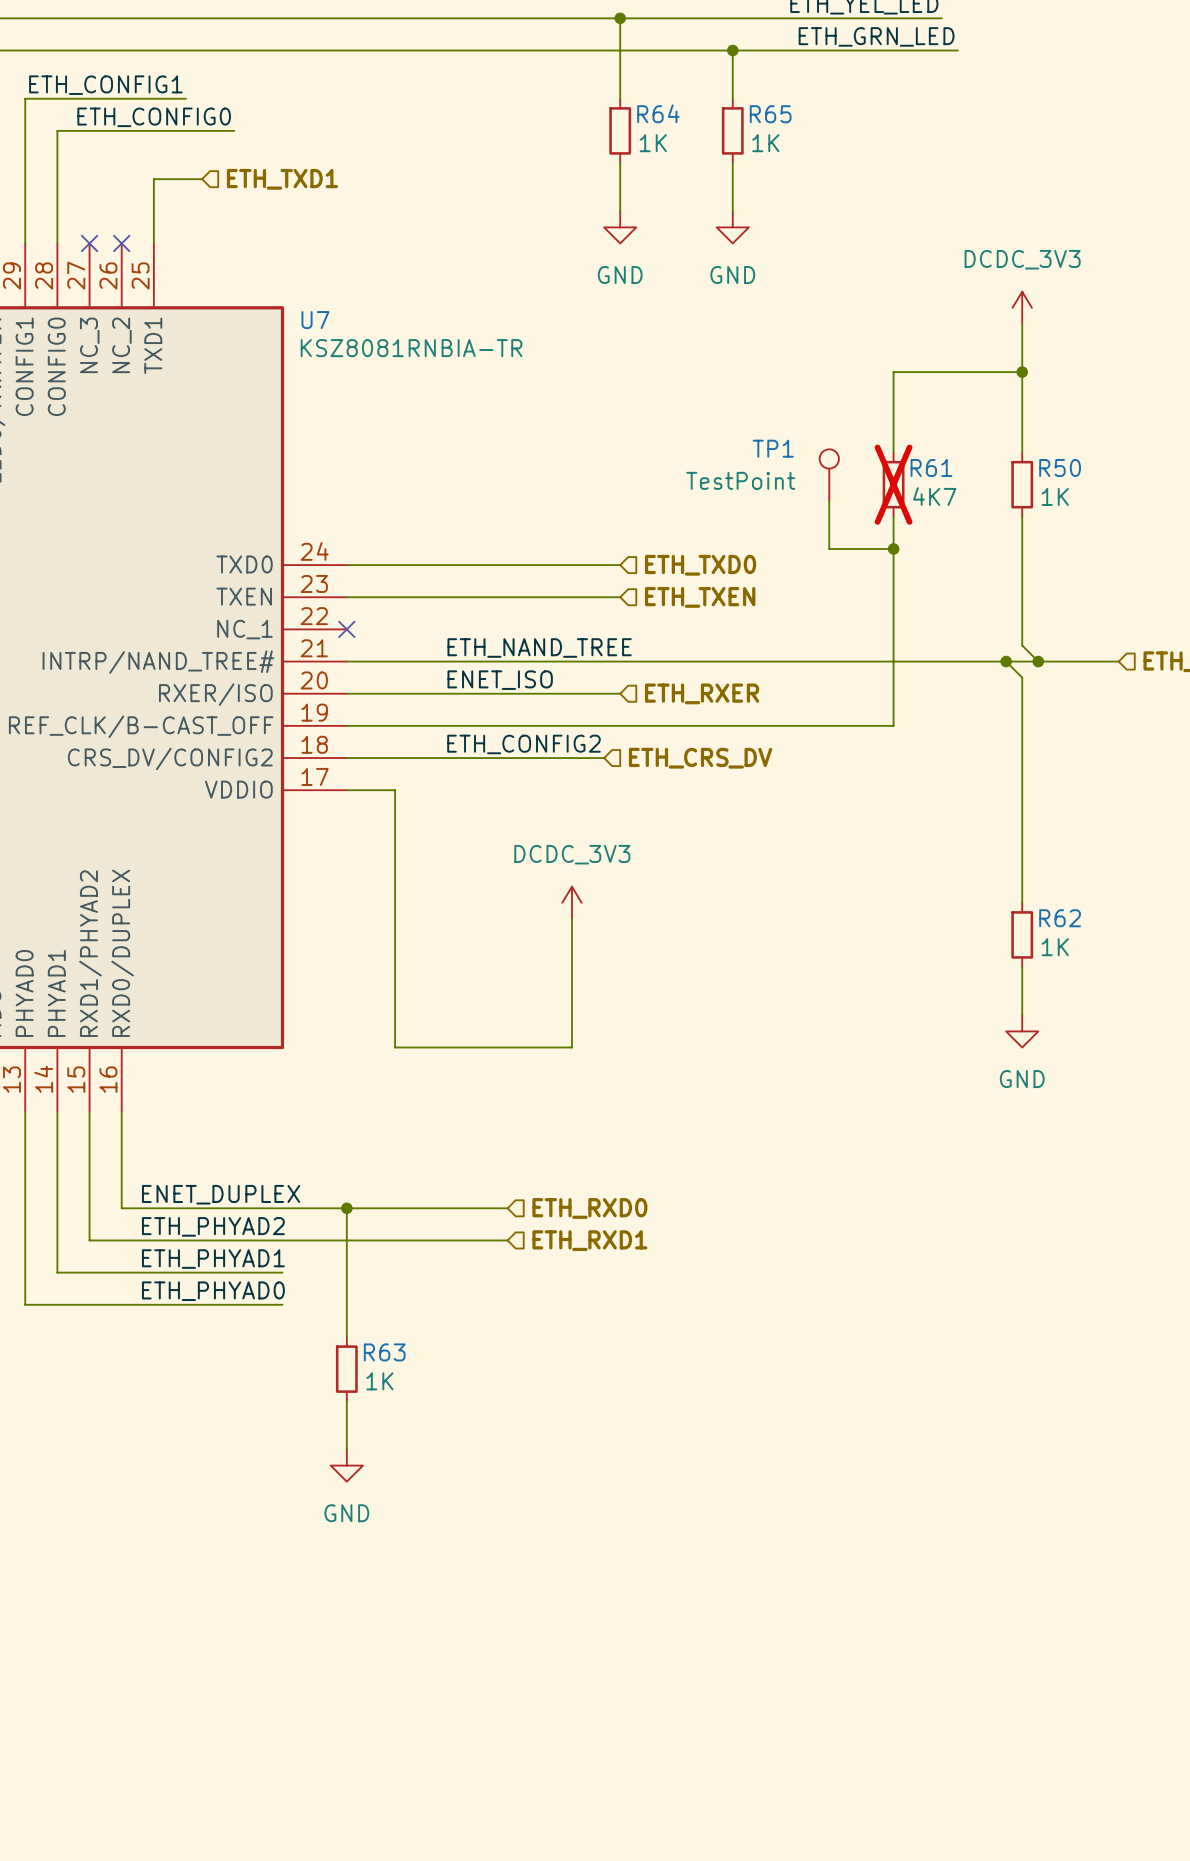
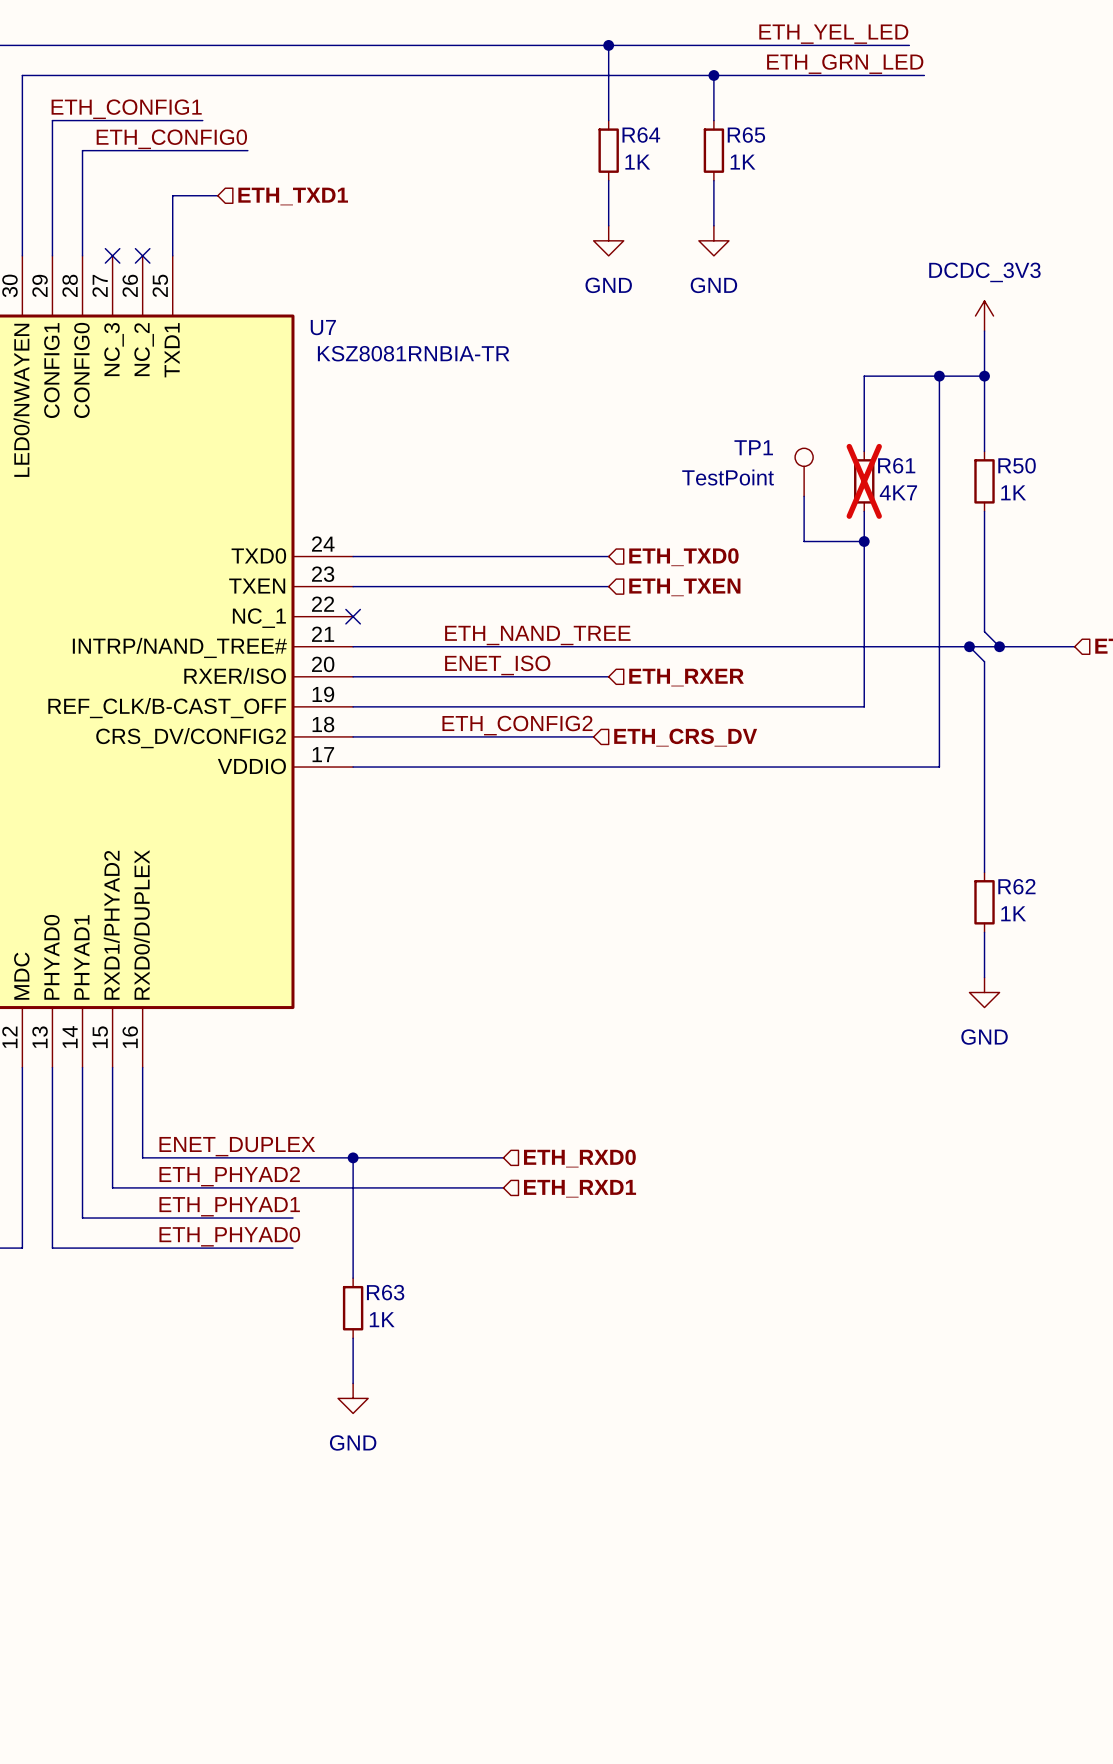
junction: none -> (939, 376)
wire: (395, 790) (395, 1047) (571, 1047) (571, 918) -> (398, 767) (939, 767) (939, 376)
power symbol: DCDC_3V3 (571, 902) -> none

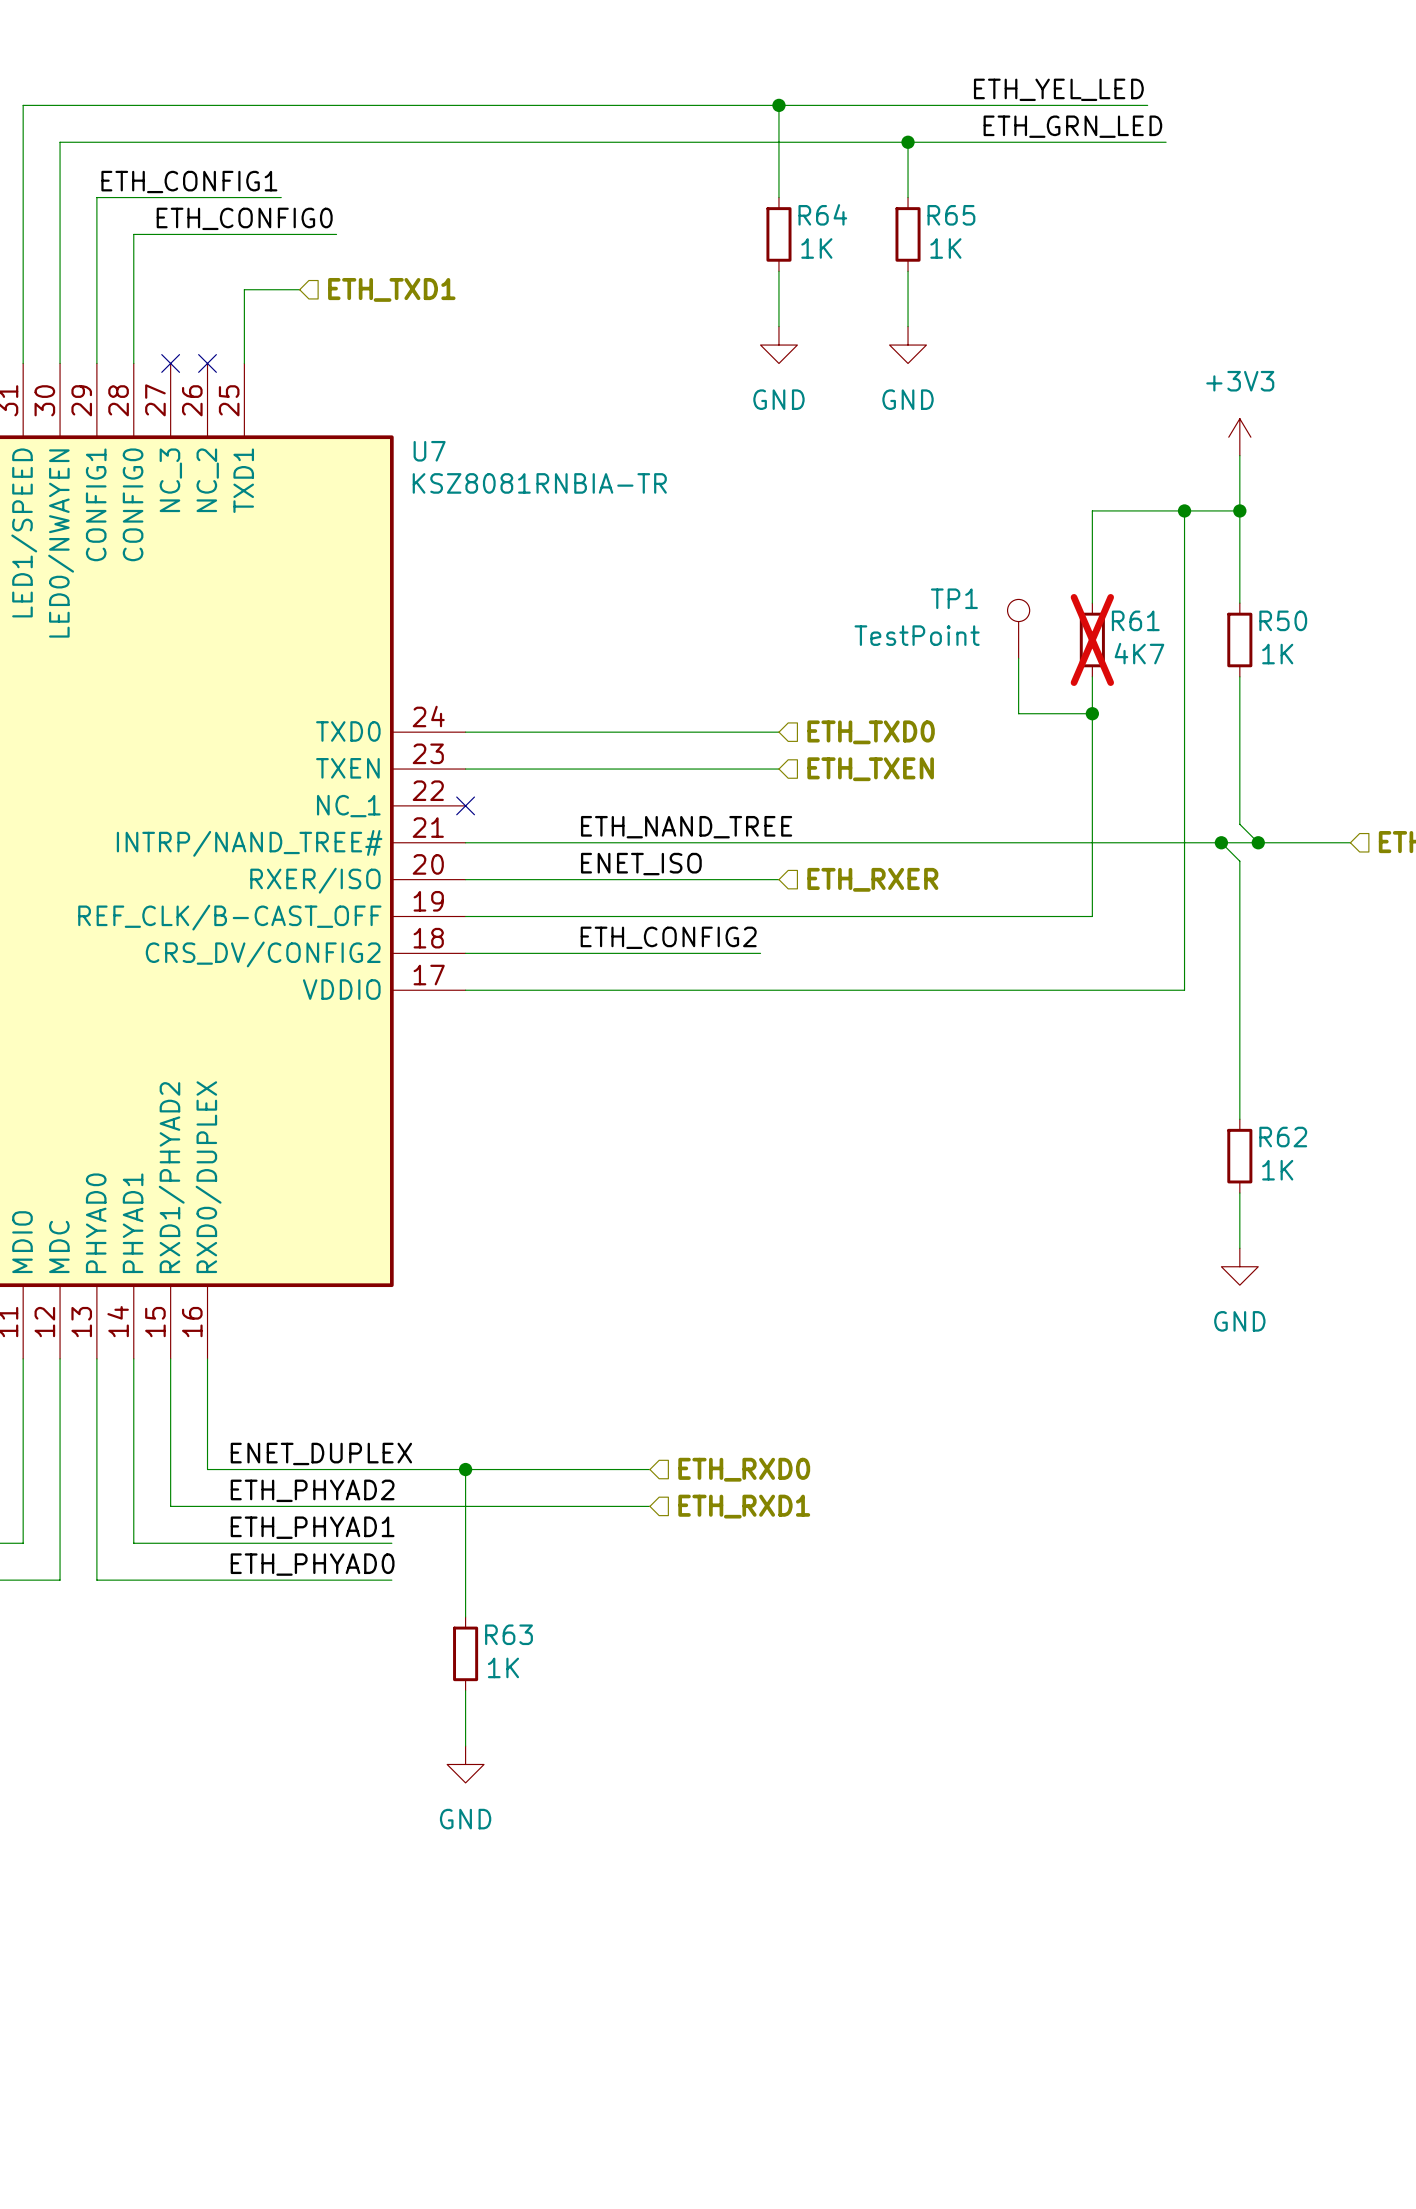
power symbol: DCDC_3V3 (984, 316) -> +3V3 (1239, 437)
hierarchical label: ETH_CRS_DV (685, 737) -> none

